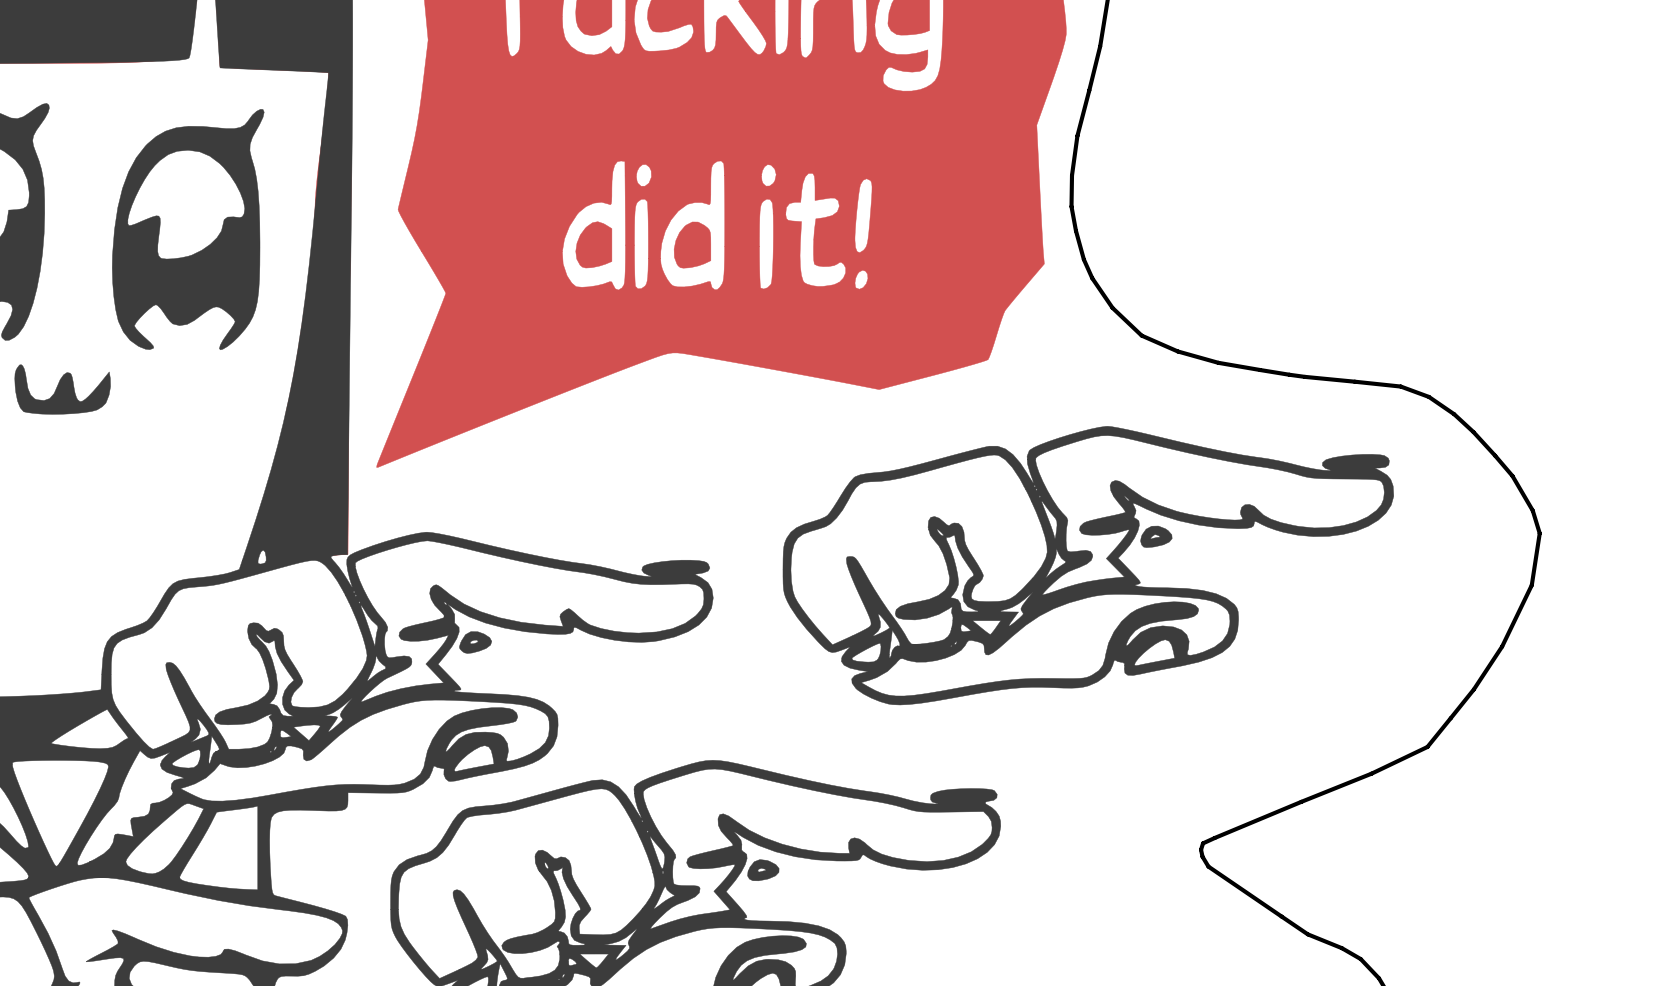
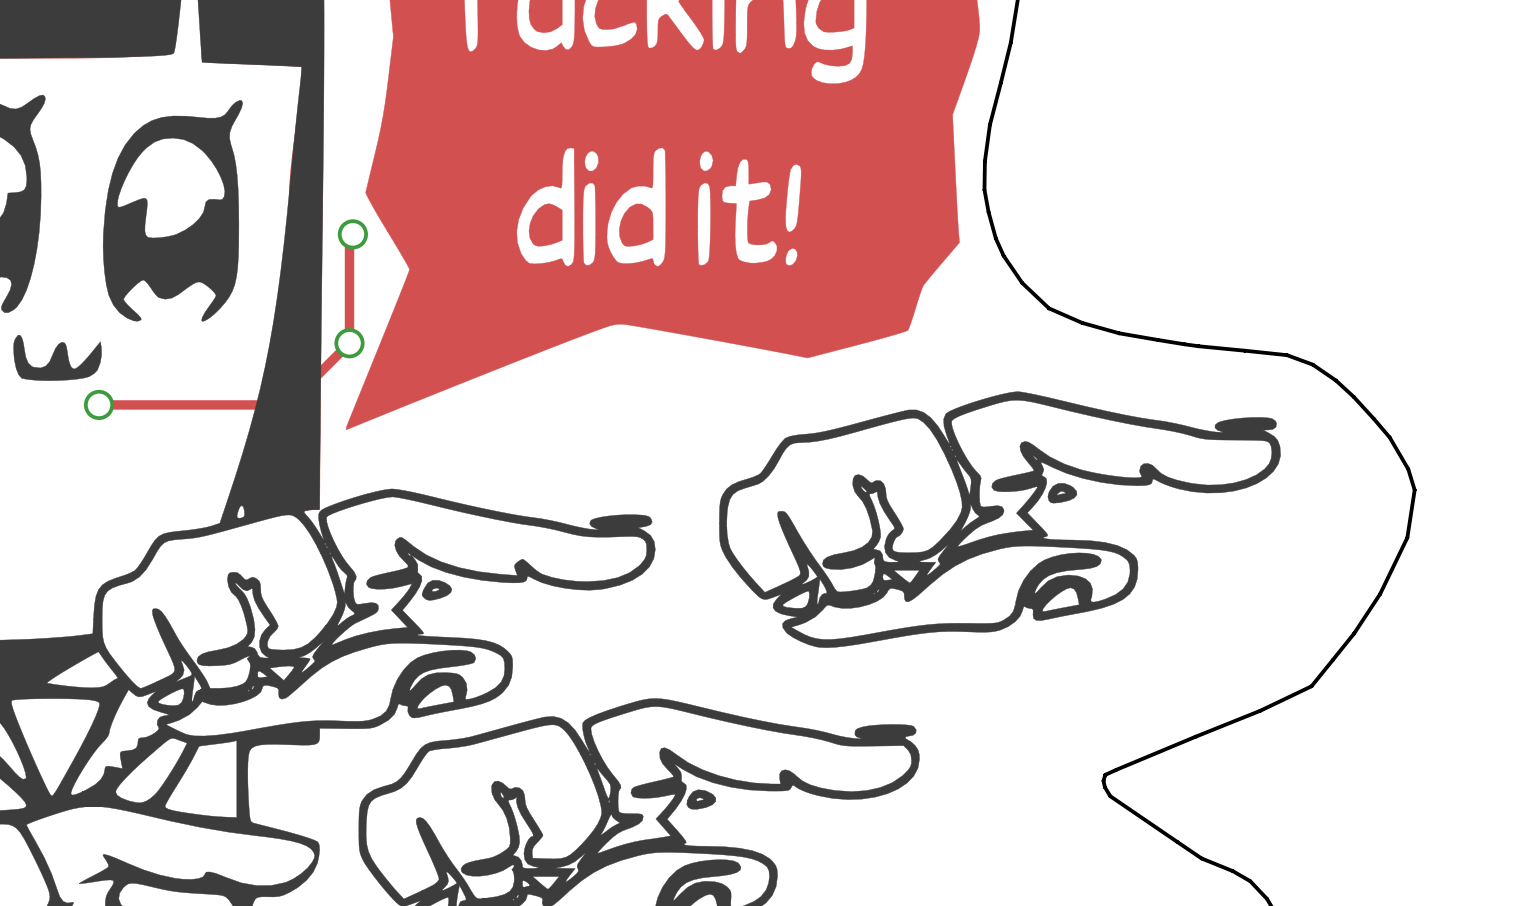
track: none -> (352, 234) (349, 237) (349, 343) (287, 404) (98, 404)
via: none -> (352, 234)
via: none -> (349, 343)
via: none -> (98, 404)

